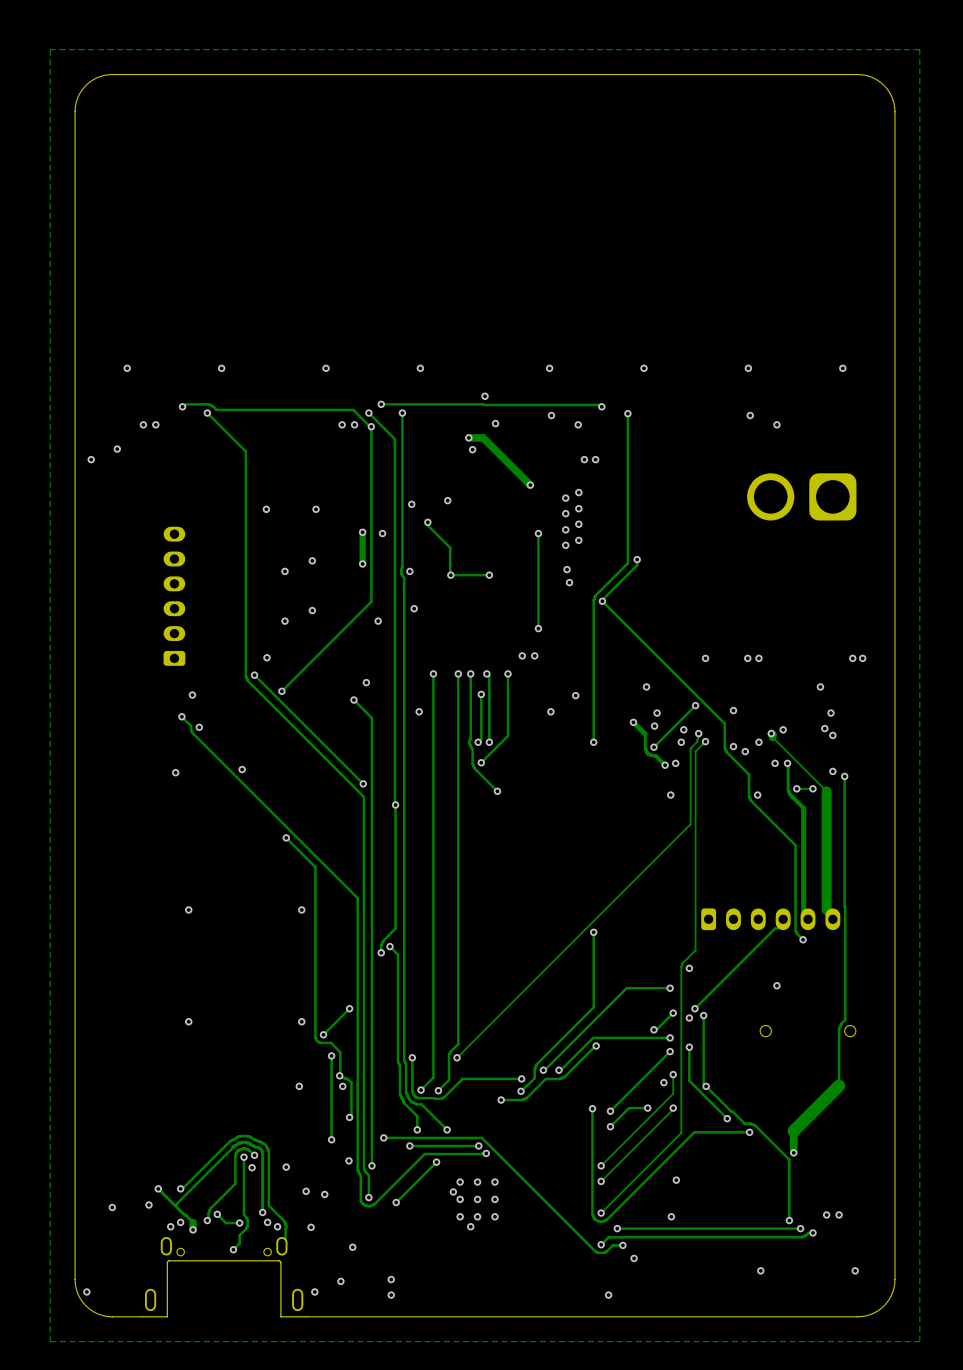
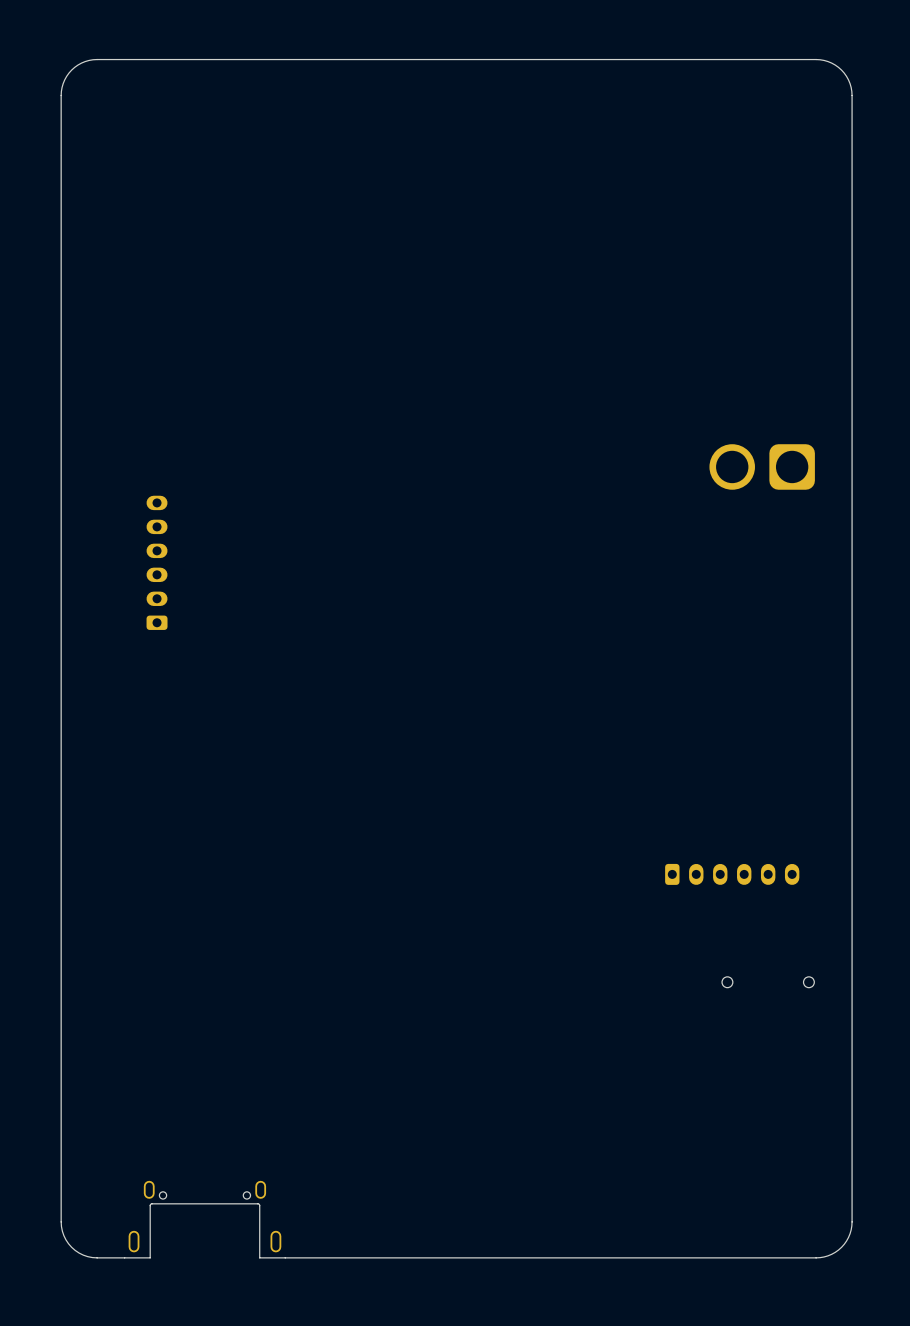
zone outline: (919, 49) (50, 49) (50, 1341) (919, 1341) (919, 49) -> none
via: (127, 368) -> none
via: (221, 368) -> none
via: (326, 368) -> none
via: (420, 368) -> none
via: (549, 368) -> none
via: (644, 368) -> none
via: (748, 368) -> none
via: (842, 368) -> none
via: (485, 396) -> none
track: (381, 404) (598, 404) (601, 406) -> none
via: (381, 404) -> none
track: (182, 406) (186, 404) (208, 404) (216, 409) (353, 409) (370, 426) -> none
via: (182, 406) -> none
via: (601, 406) -> none
track: (207, 413) (245, 451) (246, 678) (363, 796) (363, 1168) (368, 1175) (368, 1197) -> none
via: (207, 413) -> none
track: (368, 413) (394, 439) (394, 804) -> none
via: (368, 413) -> none
track: (402, 413) (401, 572) (404, 578) (404, 1060) (406, 1064) (406, 1092) (411, 1101) (421, 1104) (447, 1129) -> none
via: (402, 413) -> none
track: (627, 413) (627, 563) (595, 595) (593, 600) (593, 742) -> none
via: (627, 413) -> none
via: (551, 415) -> none
via: (750, 415) -> none
via: (495, 423) -> none
via: (143, 424) -> none
via: (155, 424) -> none
via: (342, 424) -> none
via: (354, 424) -> none
via: (578, 424) -> none
via: (776, 424) -> none
track: (371, 426) (371, 601) (281, 691) -> none
via: (371, 426) -> none
track: (468, 437) (483, 437) (530, 485) -> none
via: (468, 437) -> none
via: (117, 449) -> none
via: (472, 449) -> none
via: (91, 459) -> none
via: (584, 459) -> none
via: (595, 459) -> none
via: (530, 485) -> none
via: (578, 492) -> none
via: (565, 498) -> none
via: (447, 500) -> none
via: (411, 504) -> none
via: (578, 508) -> none
via: (266, 509) -> none
via: (316, 509) -> none
via: (565, 513) -> none
track: (427, 522) (427, 525) (450, 547) (450, 574) -> none
via: (427, 522) -> none
via: (578, 524) -> none
via: (565, 529) -> none
track: (362, 532) (362, 563) -> none
via: (362, 532) -> none
via: (382, 533) -> none
track: (538, 533) (538, 628) -> none
via: (538, 533) -> none
via: (578, 540) -> none
via: (565, 545) -> none
track: (637, 559) (637, 565) (602, 600) -> none
via: (637, 559) -> none
via: (312, 560) -> none
via: (362, 563) -> none
via: (567, 569) -> none
via: (285, 571) -> none
via: (409, 571) -> none
via: (450, 575) -> none
track: (489, 575) (450, 575) -> none
via: (489, 575) -> none
via: (569, 582) -> none
track: (602, 601) (724, 723) (725, 749) (749, 774) (749, 796) (750, 800) (795, 845) (795, 931) (803, 939) -> none
via: (602, 601) -> none
via: (414, 608) -> none
via: (312, 610) -> none
via: (285, 621) -> none
via: (378, 621) -> none
via: (538, 628) -> none
via: (522, 655) -> none
via: (534, 655) -> none
via: (266, 657) -> none
via: (705, 658) -> none
via: (747, 658) -> none
via: (758, 658) -> none
via: (852, 658) -> none
via: (862, 658) -> none
track: (433, 673) (433, 1077) (421, 1090) -> none
via: (433, 673) -> none
track: (458, 673) (458, 1044) (448, 1054) (448, 1080) (438, 1090) -> none
via: (458, 673) -> none
track: (470, 673) (469, 743) (472, 749) (472, 763) (474, 768) (497, 791) -> none
via: (470, 673) -> none
track: (486, 673) (489, 676) (489, 742) -> none
via: (486, 673) -> none
track: (508, 673) (508, 736) (481, 762) -> none
via: (508, 673) -> none
track: (254, 675) (363, 783) -> none
via: (254, 675) -> none
via: (366, 682) -> none
via: (646, 686) -> none
via: (820, 686) -> none
via: (281, 691) -> none
track: (481, 694) (481, 739) (478, 742) -> none
via: (481, 694) -> none
via: (192, 695) -> none
via: (575, 695) -> none
track: (353, 700) (371, 718) (371, 1165) -> none
via: (353, 700) -> none
track: (695, 705) (653, 747) -> none
via: (695, 705) -> none
via: (733, 710) -> none
via: (419, 711) -> none
via: (550, 711) -> none
via: (657, 713) -> none
via: (831, 713) -> none
track: (181, 716) (191, 726) (192, 732) (357, 898) (357, 1170) (360, 1175) (362, 1203) (367, 1206) (374, 1204) (424, 1154) (486, 1153) -> none
via: (181, 716) -> none
track: (633, 722) (645, 734) (647, 752) (655, 755) (665, 765) -> none
via: (633, 722) -> none
via: (654, 726) -> none
via: (199, 727) -> none
via: (824, 728) -> none
via: (683, 729) -> none
via: (783, 729) -> none
track: (698, 733) (697, 741) (690, 749) (690, 824) (457, 1057) -> none
via: (698, 733) -> none
track: (771, 733) (772, 737) (826, 791) (826, 909) -> none
via: (771, 733) -> none
via: (832, 735) -> none
track: (705, 741) (695, 751) (695, 950) (681, 966) (681, 1132) (601, 1213) -> none
via: (705, 741) -> none
via: (478, 742) -> none
via: (489, 742) -> none
via: (593, 742) -> none
via: (681, 742) -> none
via: (758, 742) -> none
via: (733, 746) -> none
via: (653, 747) -> none
via: (745, 751) -> none
via: (481, 762) -> none
via: (675, 763) -> none
via: (775, 763) -> none
track: (787, 763) (788, 791) (803, 808) (803, 911) -> none
via: (787, 763) -> none
via: (665, 765) -> none
via: (242, 769) -> none
via: (832, 771) -> none
via: (175, 772) -> none
via: (844, 776) -> none
track: (844, 779) (845, 1019) (839, 1028) (839, 1085) (793, 1131) (793, 1152) -> none
via: (363, 783) -> none
via: (796, 788) -> none
track: (812, 788) (796, 788) -> none
via: (812, 788) -> none
via: (497, 791) -> none
via: (670, 795) -> none
via: (757, 795) -> none
track: (395, 804) (395, 928) (383, 941) (381, 952) -> none
via: (395, 804) -> none
track: (286, 837) (315, 867) (315, 1037) (320, 1042) (330, 1042) (340, 1052) (340, 1075) -> none
via: (286, 837) -> none
via: (188, 909) -> none
via: (301, 909) -> none
track: (777, 928) (775, 928) (694, 1008) -> none
track: (593, 932) (593, 1007) (536, 1064) (534, 1078) (521, 1091) -> none
via: (593, 932) -> none
via: (803, 939) -> none
track: (389, 946) (398, 954) (399, 1093) (404, 1103) (417, 1116) (417, 1129) -> none
via: (389, 946) -> none
via: (381, 952) -> none
via: (689, 968) -> none
via: (776, 985) -> none
track: (670, 988) (626, 988) (543, 1070) -> none
via: (670, 988) -> none
track: (349, 1008) (323, 1034) -> none
via: (349, 1008) -> none
via: (694, 1008) -> none
track: (673, 1013) (656, 1029) (653, 1029) -> none
via: (673, 1013) -> none
track: (703, 1015) (703, 1083) (706, 1086) -> none
via: (703, 1015) -> none
via: (689, 1018) -> none
via: (188, 1021) -> none
via: (301, 1021) -> none
via: (653, 1029) -> none
via: (323, 1034) -> none
track: (670, 1037) (593, 1037) (558, 1070) -> none
via: (670, 1037) -> none
track: (596, 1045) (564, 1077) (545, 1078) (524, 1099) (501, 1100) -> none
via: (596, 1045) -> none
track: (689, 1047) (689, 1080) (727, 1118) -> none
via: (689, 1047) -> none
track: (670, 1051) (610, 1111) -> none
via: (670, 1051) -> none
track: (331, 1055) (331, 1139) -> none
via: (331, 1055) -> none
track: (412, 1057) (412, 1091) (417, 1098) (441, 1098) (462, 1078) (521, 1078) -> none
via: (412, 1057) -> none
via: (457, 1057) -> none
via: (543, 1070) -> none
via: (558, 1070) -> none
track: (673, 1074) (673, 1093) (601, 1165) -> none
via: (673, 1074) -> none
track: (339, 1075) (351, 1082) (351, 1115) (349, 1117) -> none
via: (339, 1075) -> none
via: (521, 1078) -> none
via: (663, 1082) -> none
via: (299, 1086) -> none
via: (342, 1086) -> none
track: (706, 1086) (744, 1123) (755, 1125) (789, 1159) (789, 1220) -> none
via: (706, 1086) -> none
via: (421, 1090) -> none
via: (438, 1090) -> none
via: (521, 1091) -> none
via: (501, 1100) -> none
track: (592, 1108) (592, 1214) (594, 1218) (599, 1221) (606, 1219) (694, 1132) (749, 1132) -> none
via: (592, 1108) -> none
track: (647, 1108) (629, 1108) (610, 1126) -> none
via: (647, 1108) -> none
track: (673, 1108) (601, 1181) -> none
via: (673, 1108) -> none
via: (610, 1111) -> none
via: (349, 1117) -> none
via: (727, 1118) -> none
via: (610, 1126) -> none
via: (417, 1129) -> none
via: (447, 1129) -> none
via: (749, 1132) -> none
track: (383, 1137) (481, 1137) (595, 1251) (604, 1252) (612, 1245) (622, 1245) -> none
via: (383, 1137) -> none
via: (331, 1139) -> none
via: (409, 1146) -> none
track: (478, 1146) (409, 1146) -> none
via: (478, 1146) -> none
via: (793, 1152) -> none
via: (486, 1153) -> none
track: (254, 1155) (245, 1148) (237, 1151) (235, 1155) (235, 1183) (210, 1208) (207, 1220) -> none
via: (254, 1155) -> none
track: (244, 1157) (244, 1214) (247, 1219) (247, 1226) (239, 1235) (239, 1243) (233, 1249) -> none
via: (244, 1157) -> none
via: (348, 1160) -> none
track: (436, 1162) (396, 1202) -> none
via: (436, 1162) -> none
via: (371, 1165) -> none
via: (601, 1165) -> none
via: (252, 1167) -> none
via: (286, 1167) -> none
via: (676, 1180) -> none
via: (601, 1181) -> none
via: (460, 1182) -> none
via: (477, 1182) -> none
via: (494, 1182) -> none
track: (158, 1188) (193, 1222) (193, 1229) -> none
via: (158, 1188) -> none
track: (180, 1188) (230, 1141) (240, 1136) (247, 1136) (260, 1141) (266, 1146) (268, 1150) (268, 1205) (284, 1221) (286, 1225) (285, 1238) -> none
via: (180, 1188) -> none
via: (306, 1191) -> none
via: (453, 1191) -> none
via: (324, 1194) -> none
via: (368, 1197) -> none
via: (460, 1199) -> none
via: (477, 1199) -> none
via: (494, 1199) -> none
via: (396, 1202) -> none
via: (148, 1205) -> none
track: (175, 1205) (234, 1146) (246, 1142) (260, 1148) (262, 1152) (262, 1212) -> none
via: (112, 1207) -> none
via: (262, 1212) -> none
via: (601, 1213) -> none
track: (217, 1214) (225, 1223) (239, 1223) -> none
via: (217, 1214) -> none
via: (826, 1214) -> none
via: (839, 1214) -> none
via: (460, 1216) -> none
via: (477, 1216) -> none
via: (494, 1216) -> none
via: (671, 1216) -> none
via: (207, 1220) -> none
via: (789, 1220) -> none
via: (180, 1222) -> none
via: (267, 1222) -> none
via: (239, 1223) -> none
via: (170, 1226) -> none
via: (277, 1226) -> none
via: (470, 1226) -> none
via: (311, 1227) -> none
via: (617, 1228) -> none
track: (800, 1228) (617, 1228) -> none
via: (800, 1228) -> none
via: (193, 1229) -> none
track: (812, 1232) (808, 1232) (801, 1237) (608, 1237) (601, 1244) -> none
via: (812, 1232) -> none
via: (601, 1244) -> none
via: (622, 1245) -> none
via: (352, 1247) -> none
via: (233, 1249) -> none
via: (634, 1258) -> none
via: (760, 1270) -> none
via: (855, 1270) -> none
via: (391, 1279) -> none
via: (340, 1281) -> none
via: (86, 1291) -> none
via: (314, 1291) -> none
via: (391, 1295) -> none
via: (608, 1295) -> none

